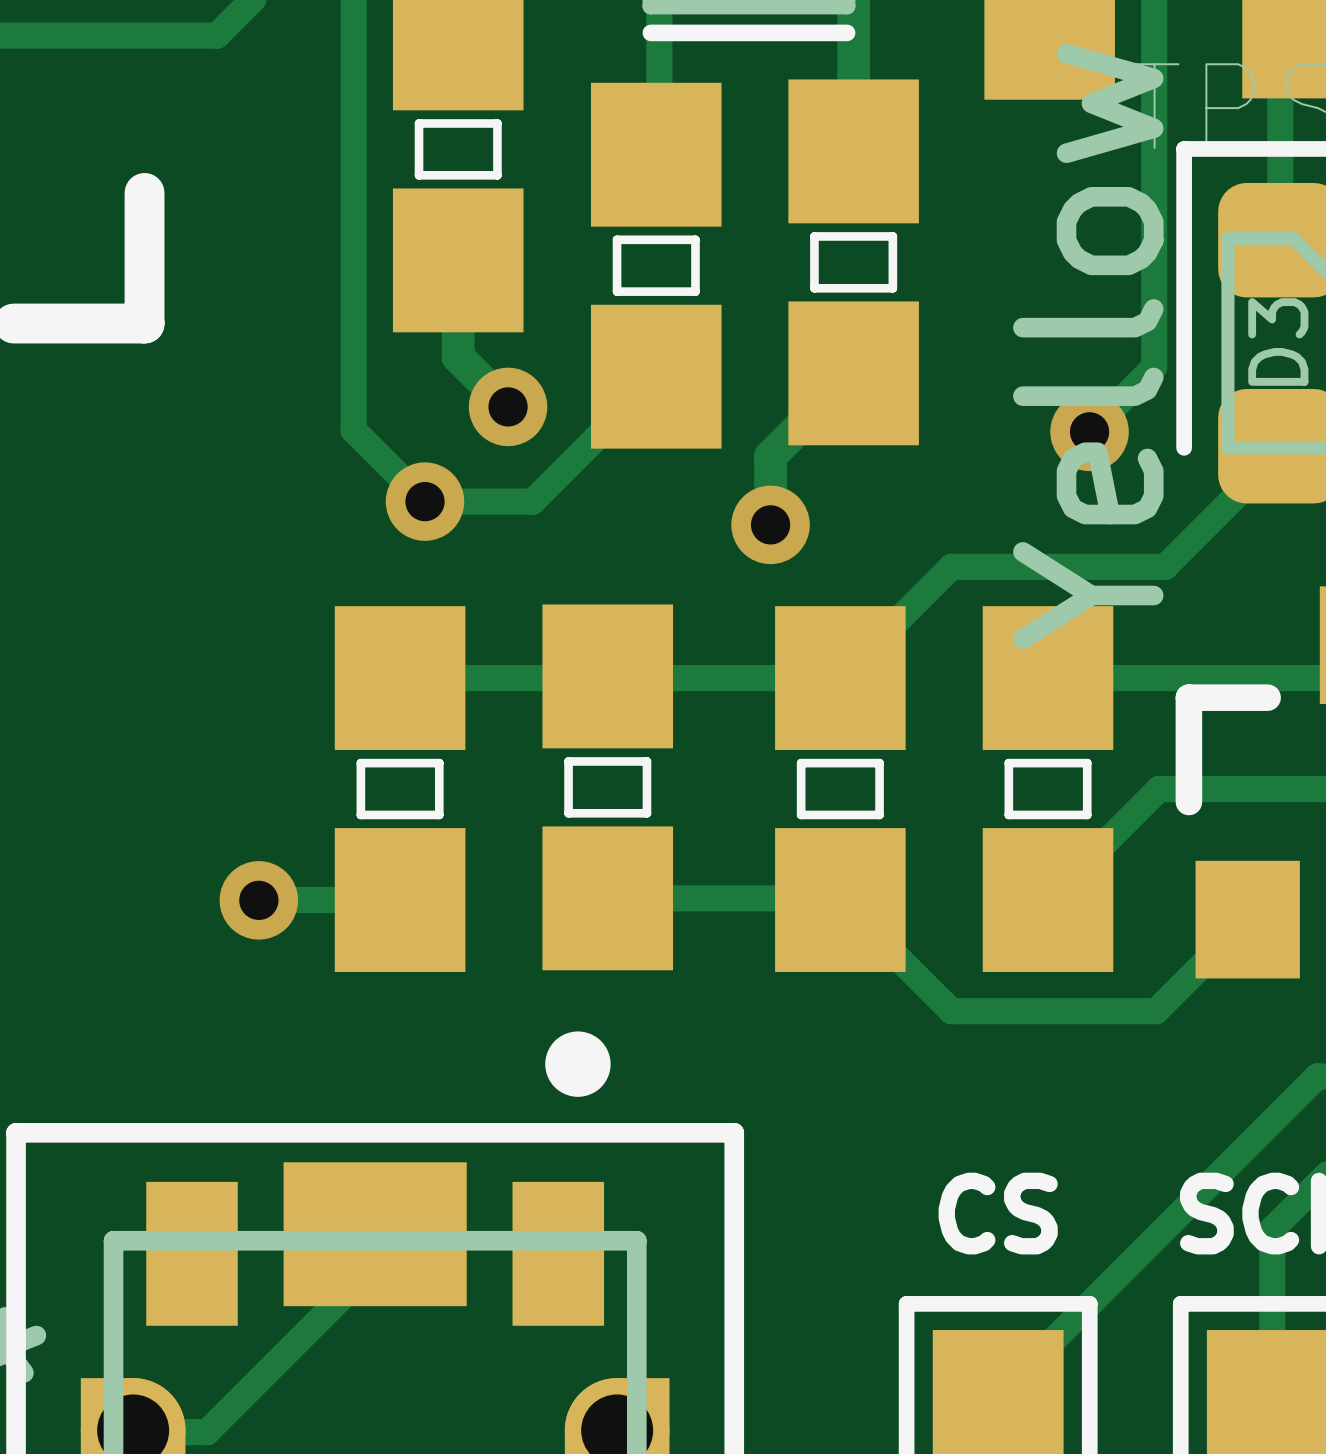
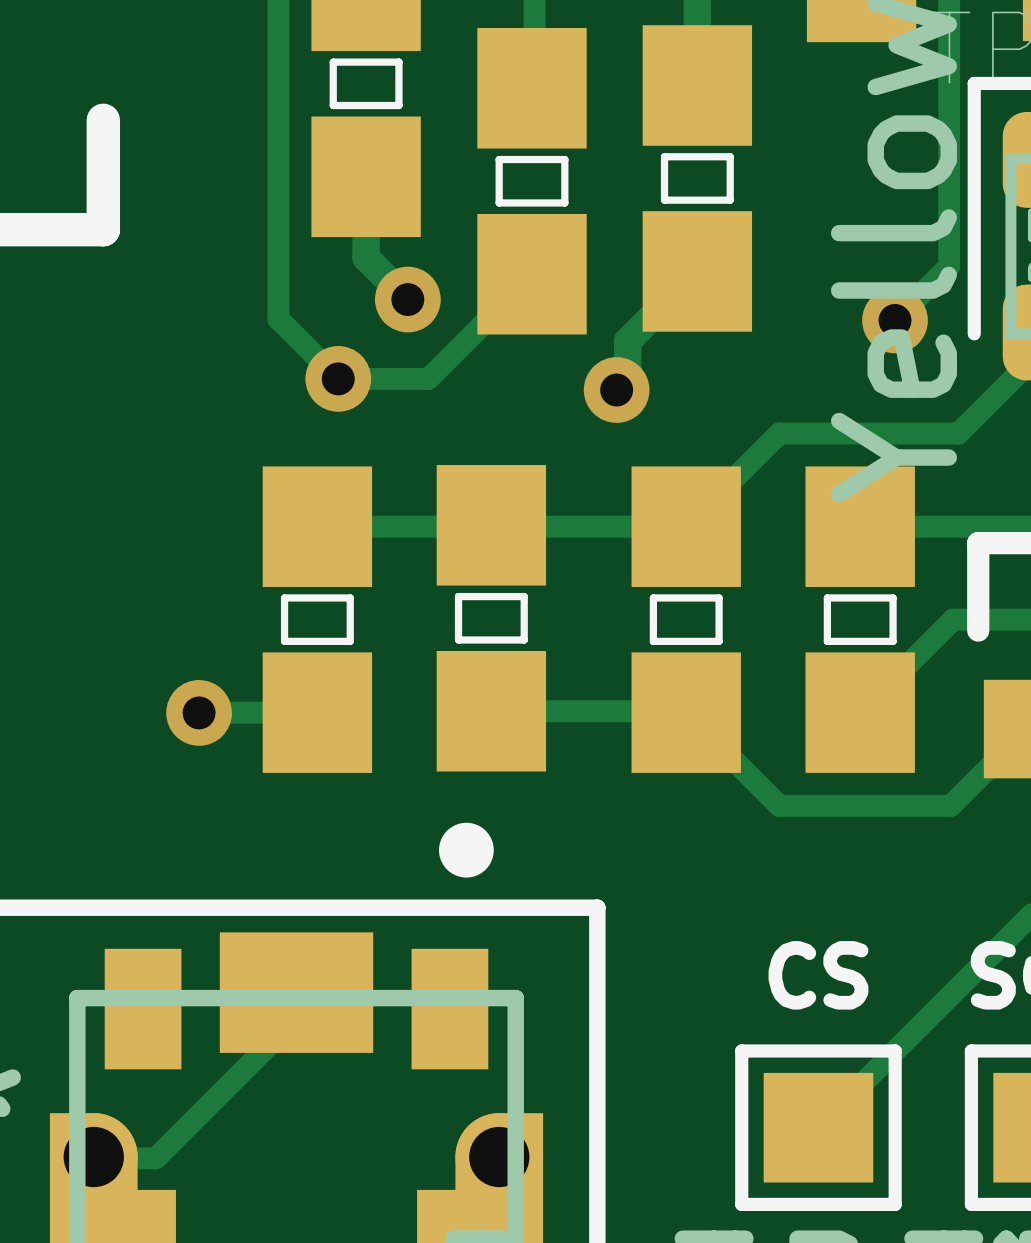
via position: (770, 524) -> (616, 390)

